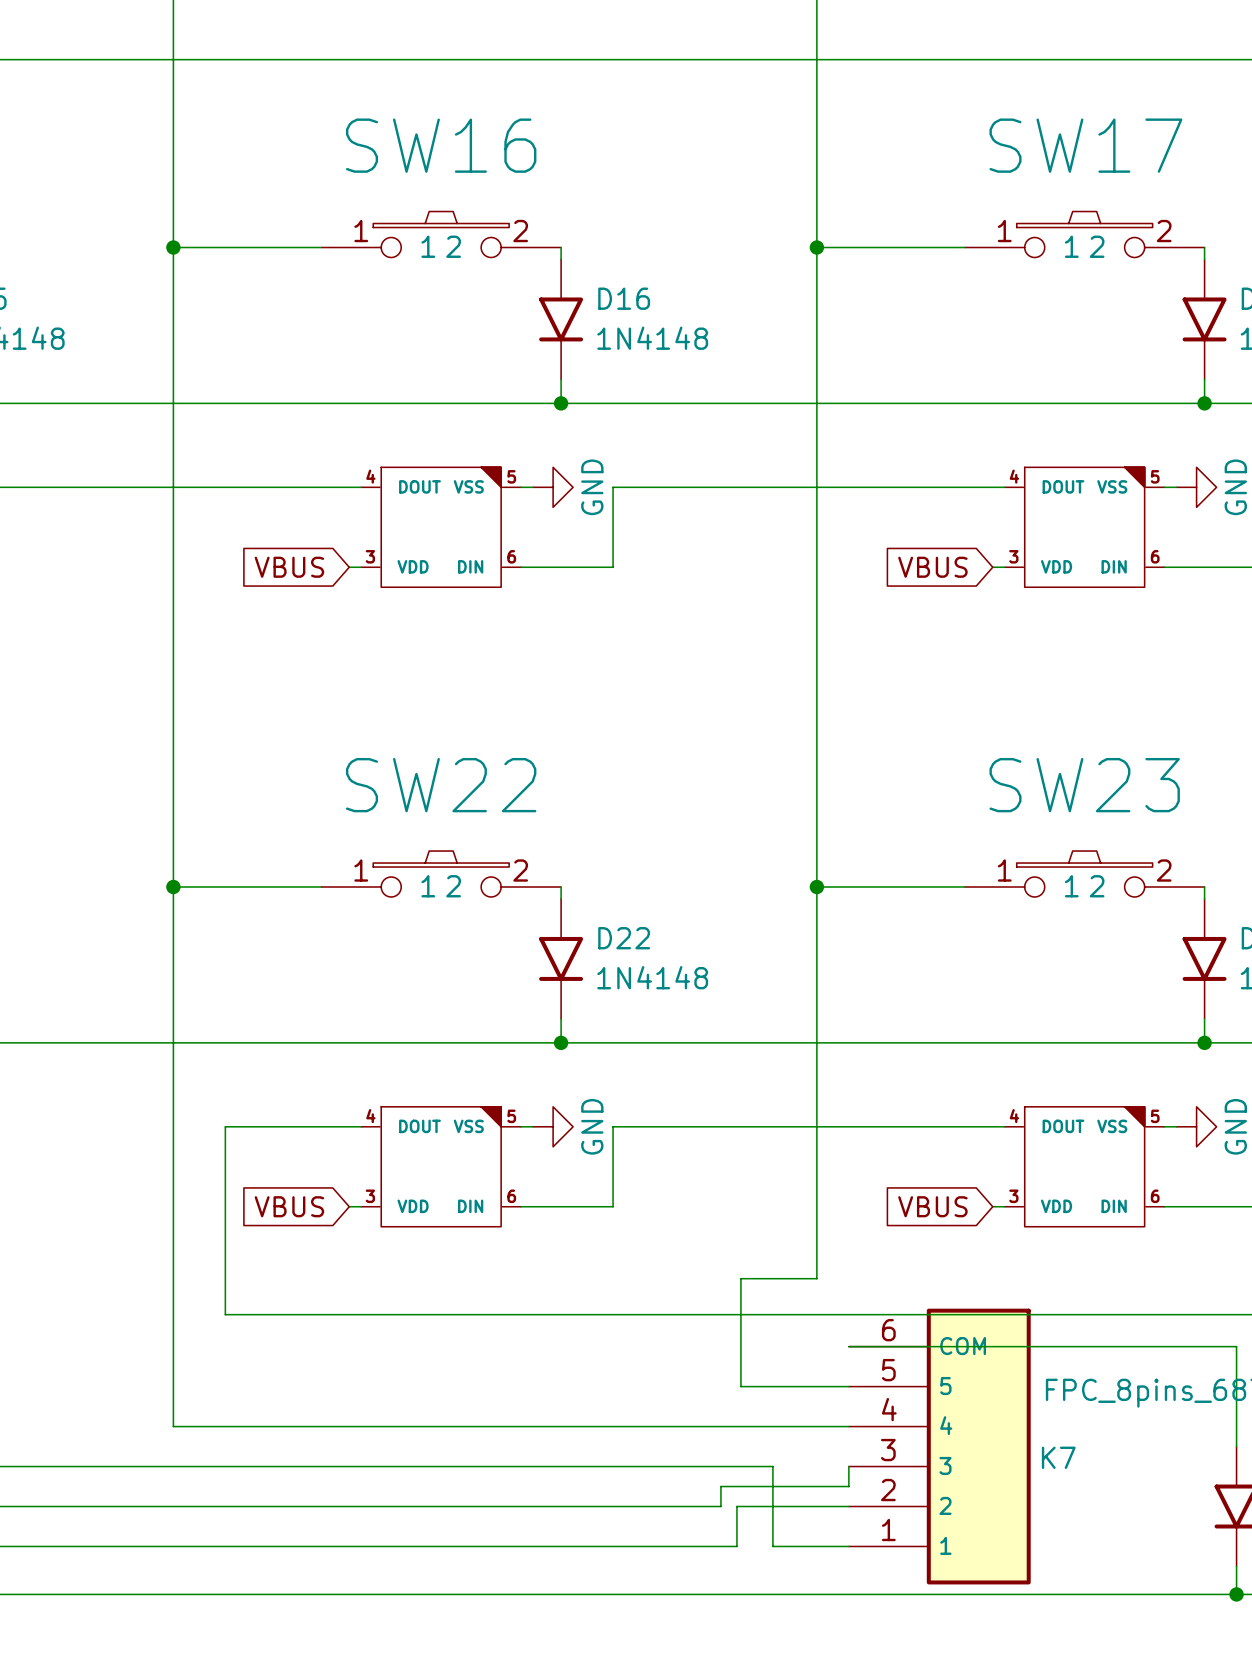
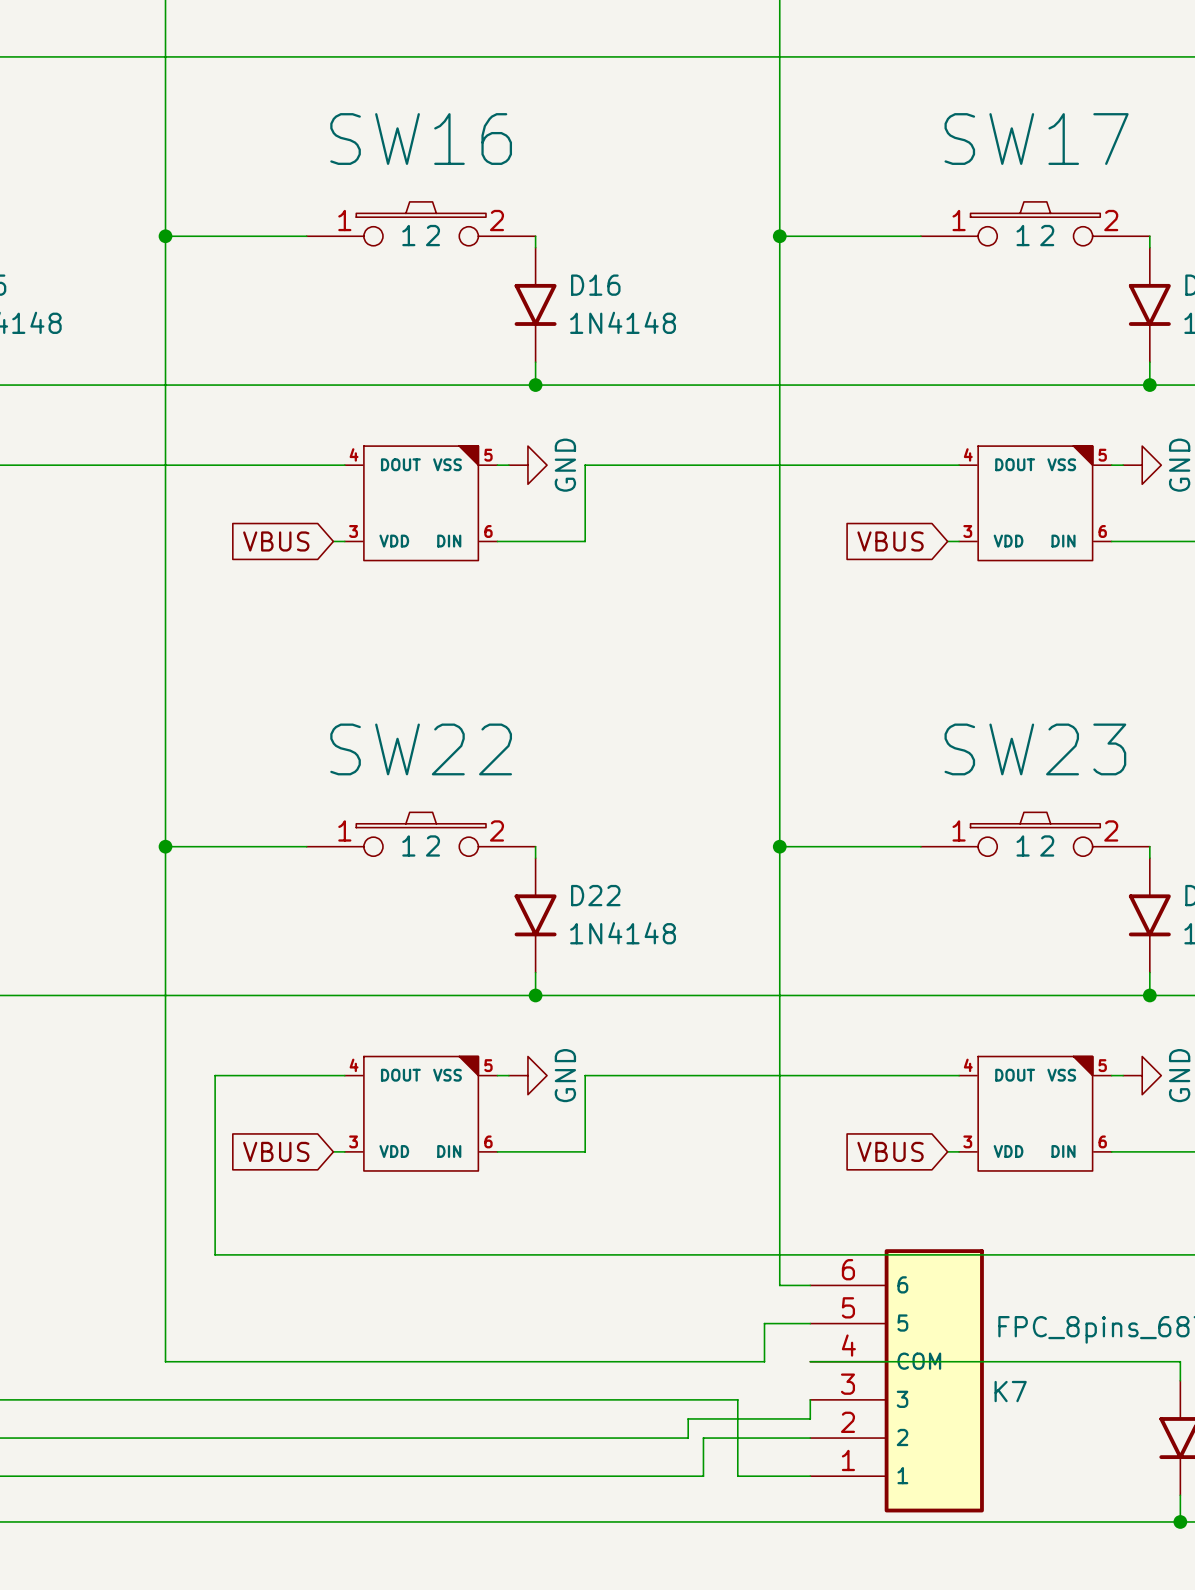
wire: (816, 1278) (740, 1278) (740, 1386) (800, 1386) -> (779, 1220) (779, 1285) (810, 1285)
wire: (848, 1346) (1236, 1346) (1236, 1426) -> (810, 1361) (1180, 1361)
K7 pin name: COM (963, 1346) -> 6 (902, 1284)
K7 pin name: 4 (946, 1425) -> COM (919, 1361)
wire: (800, 1426) (848, 1426) -> (764, 1361) (764, 1323)

